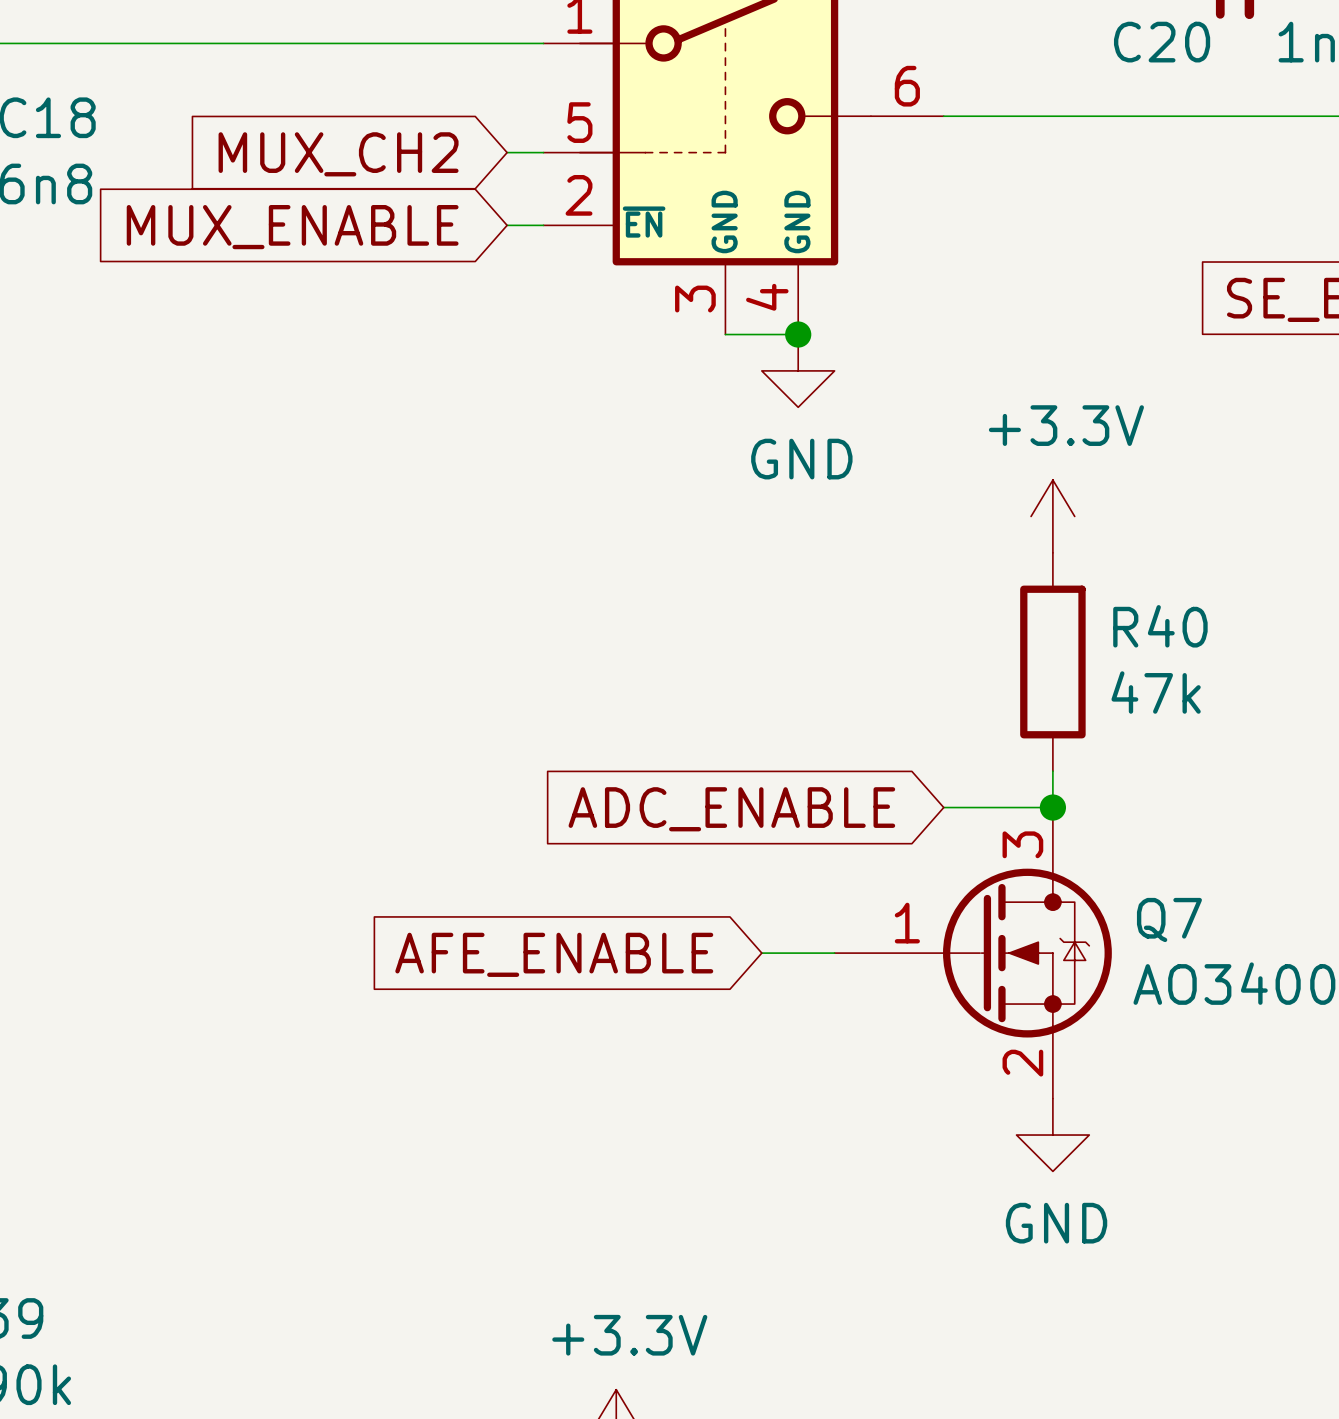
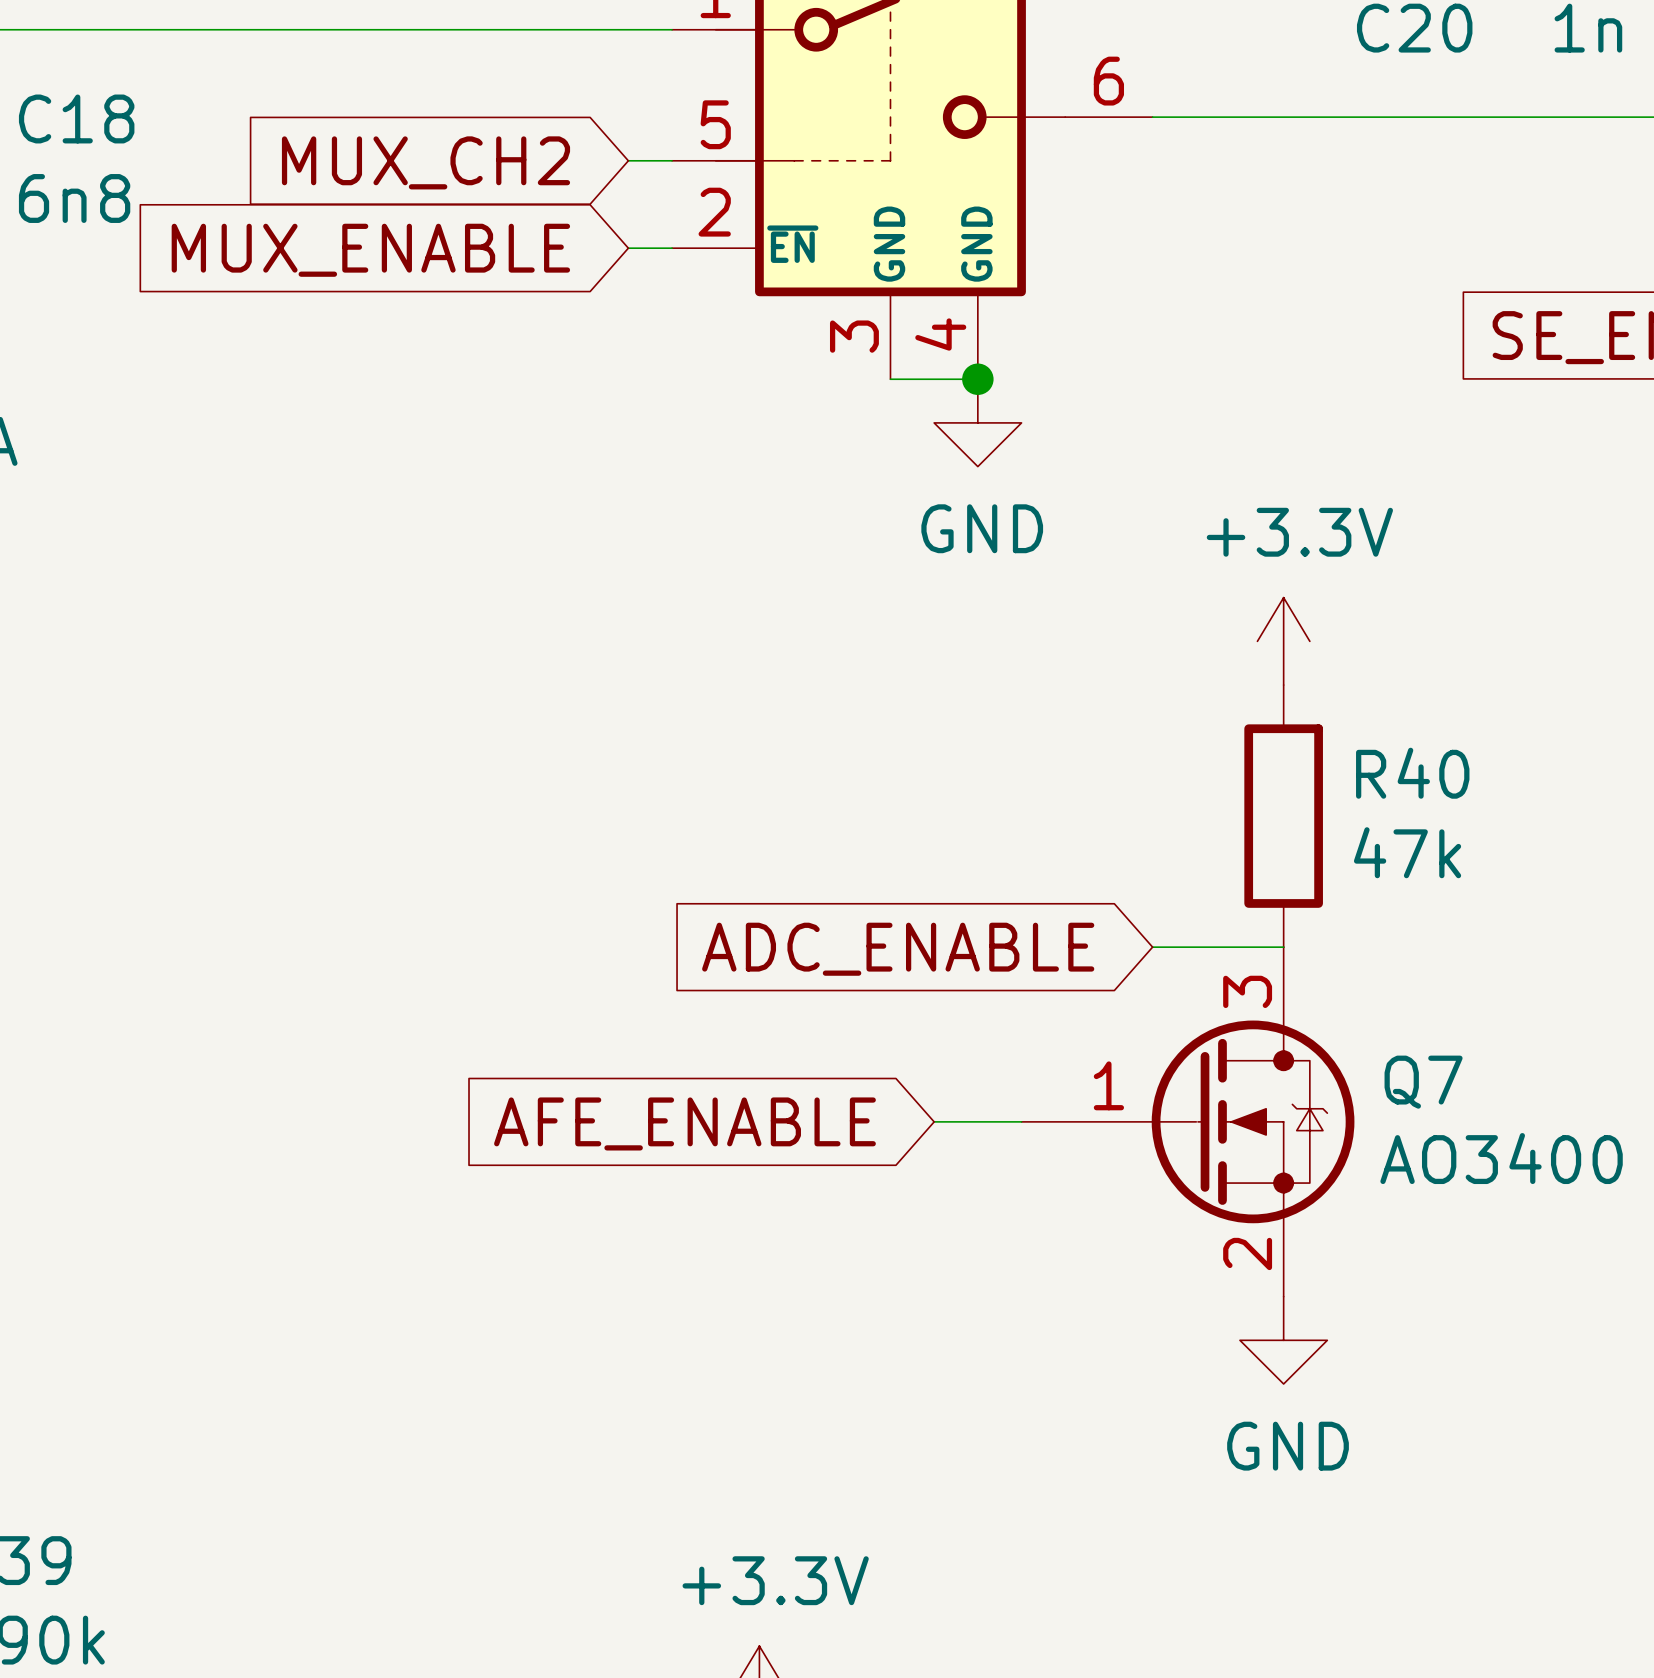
power symbol position: +3.3V (1052, 516) -> +3.3V (1283, 641)
R40 position: (1052, 662) -> (1283, 816)
junction: (1052, 807) -> none

